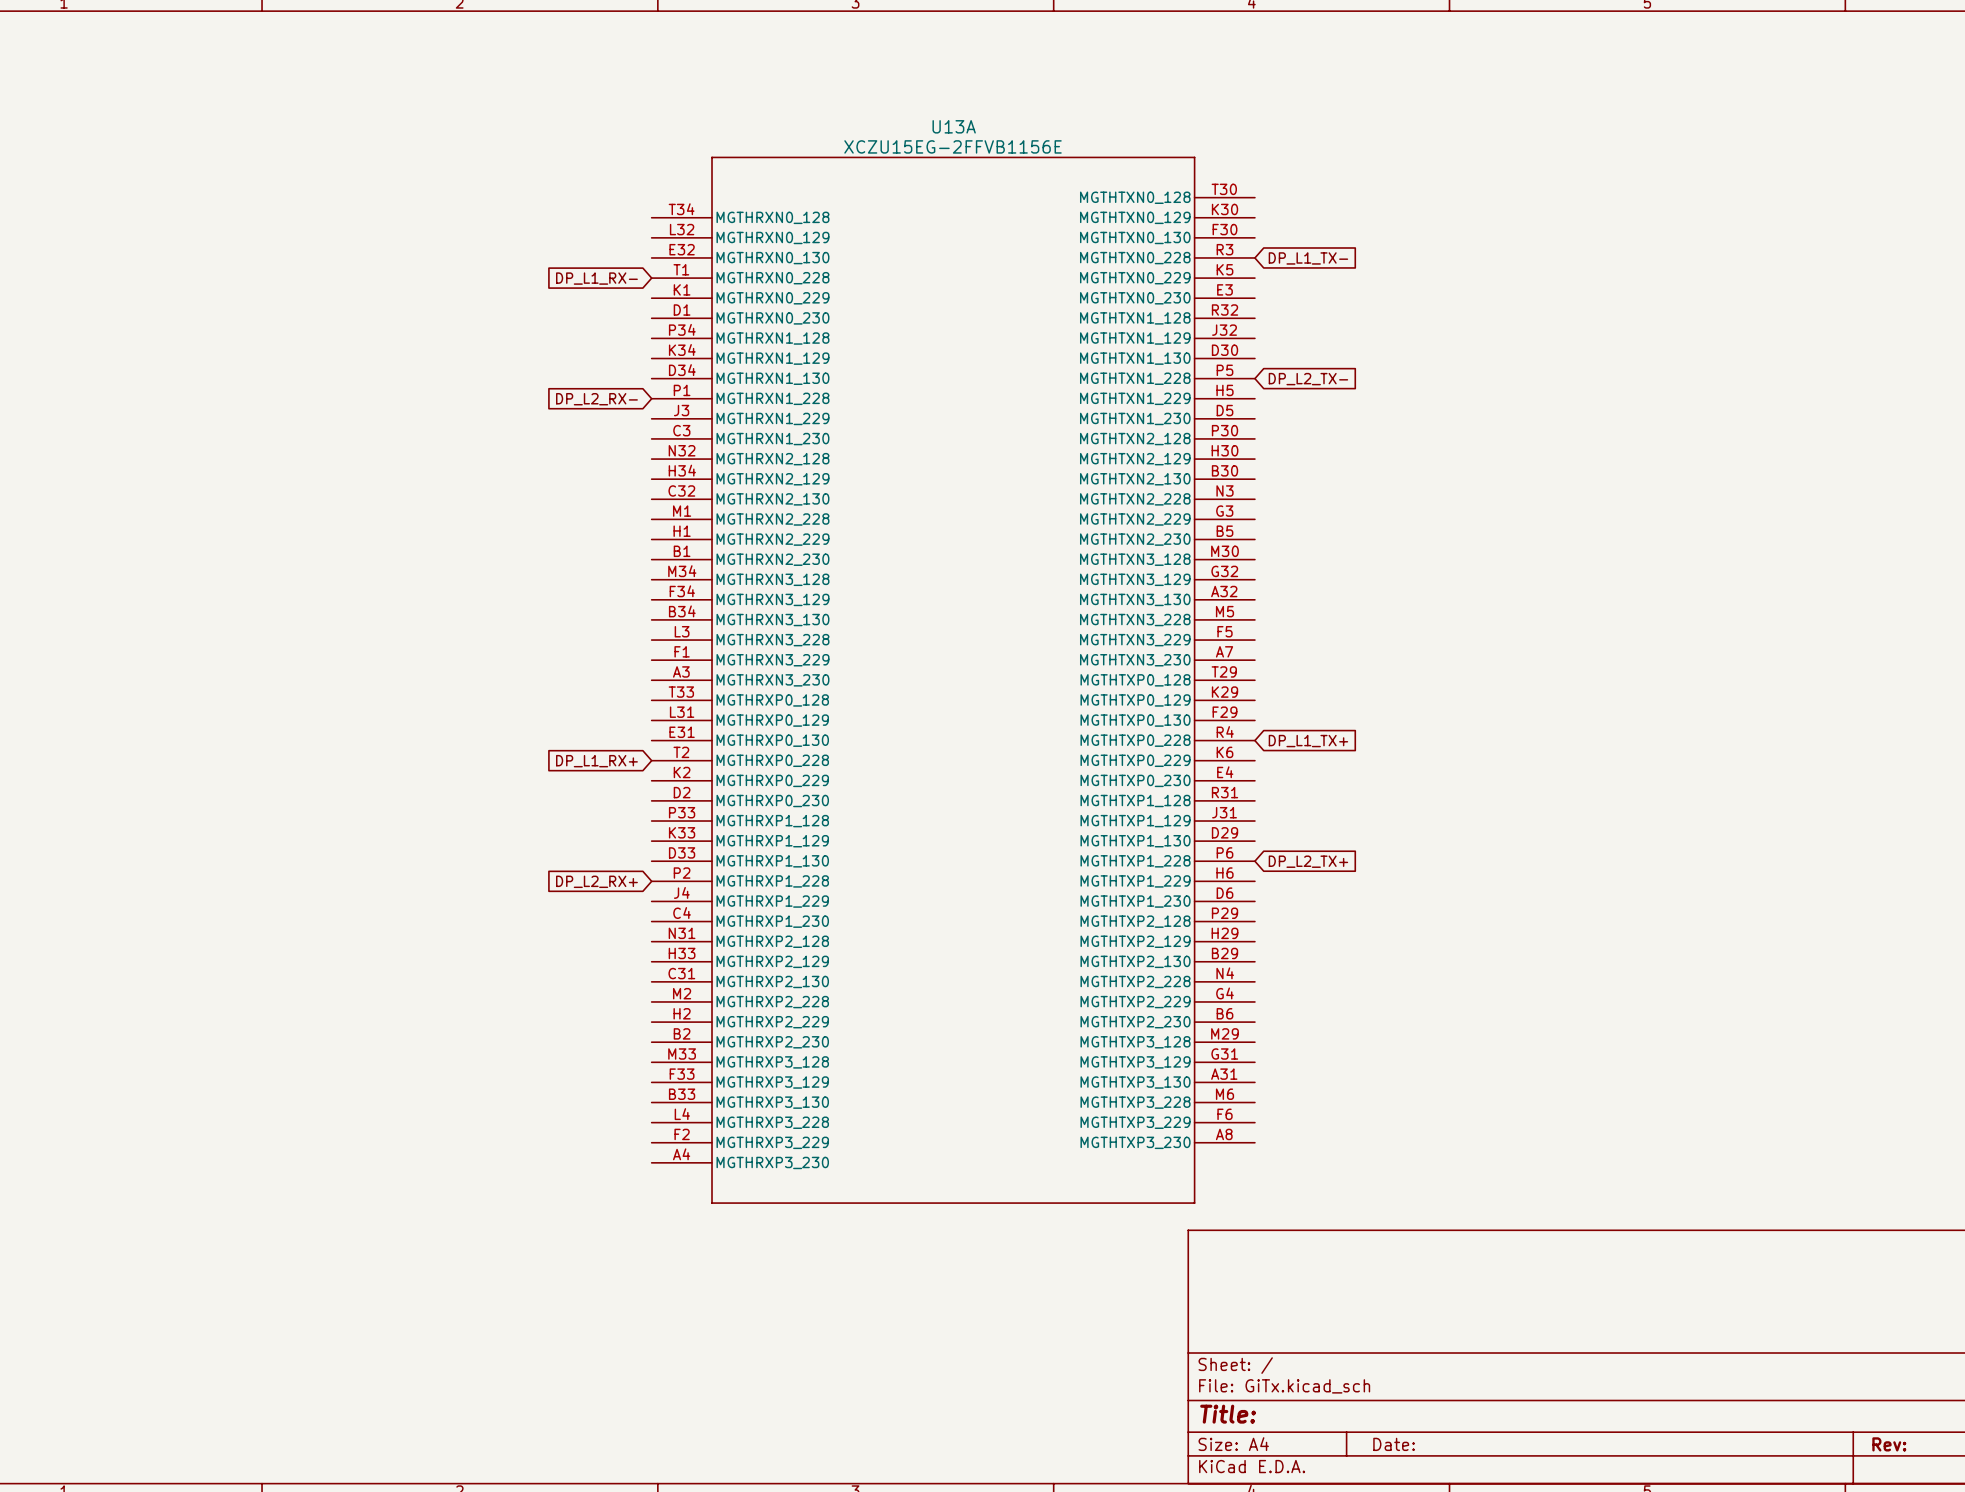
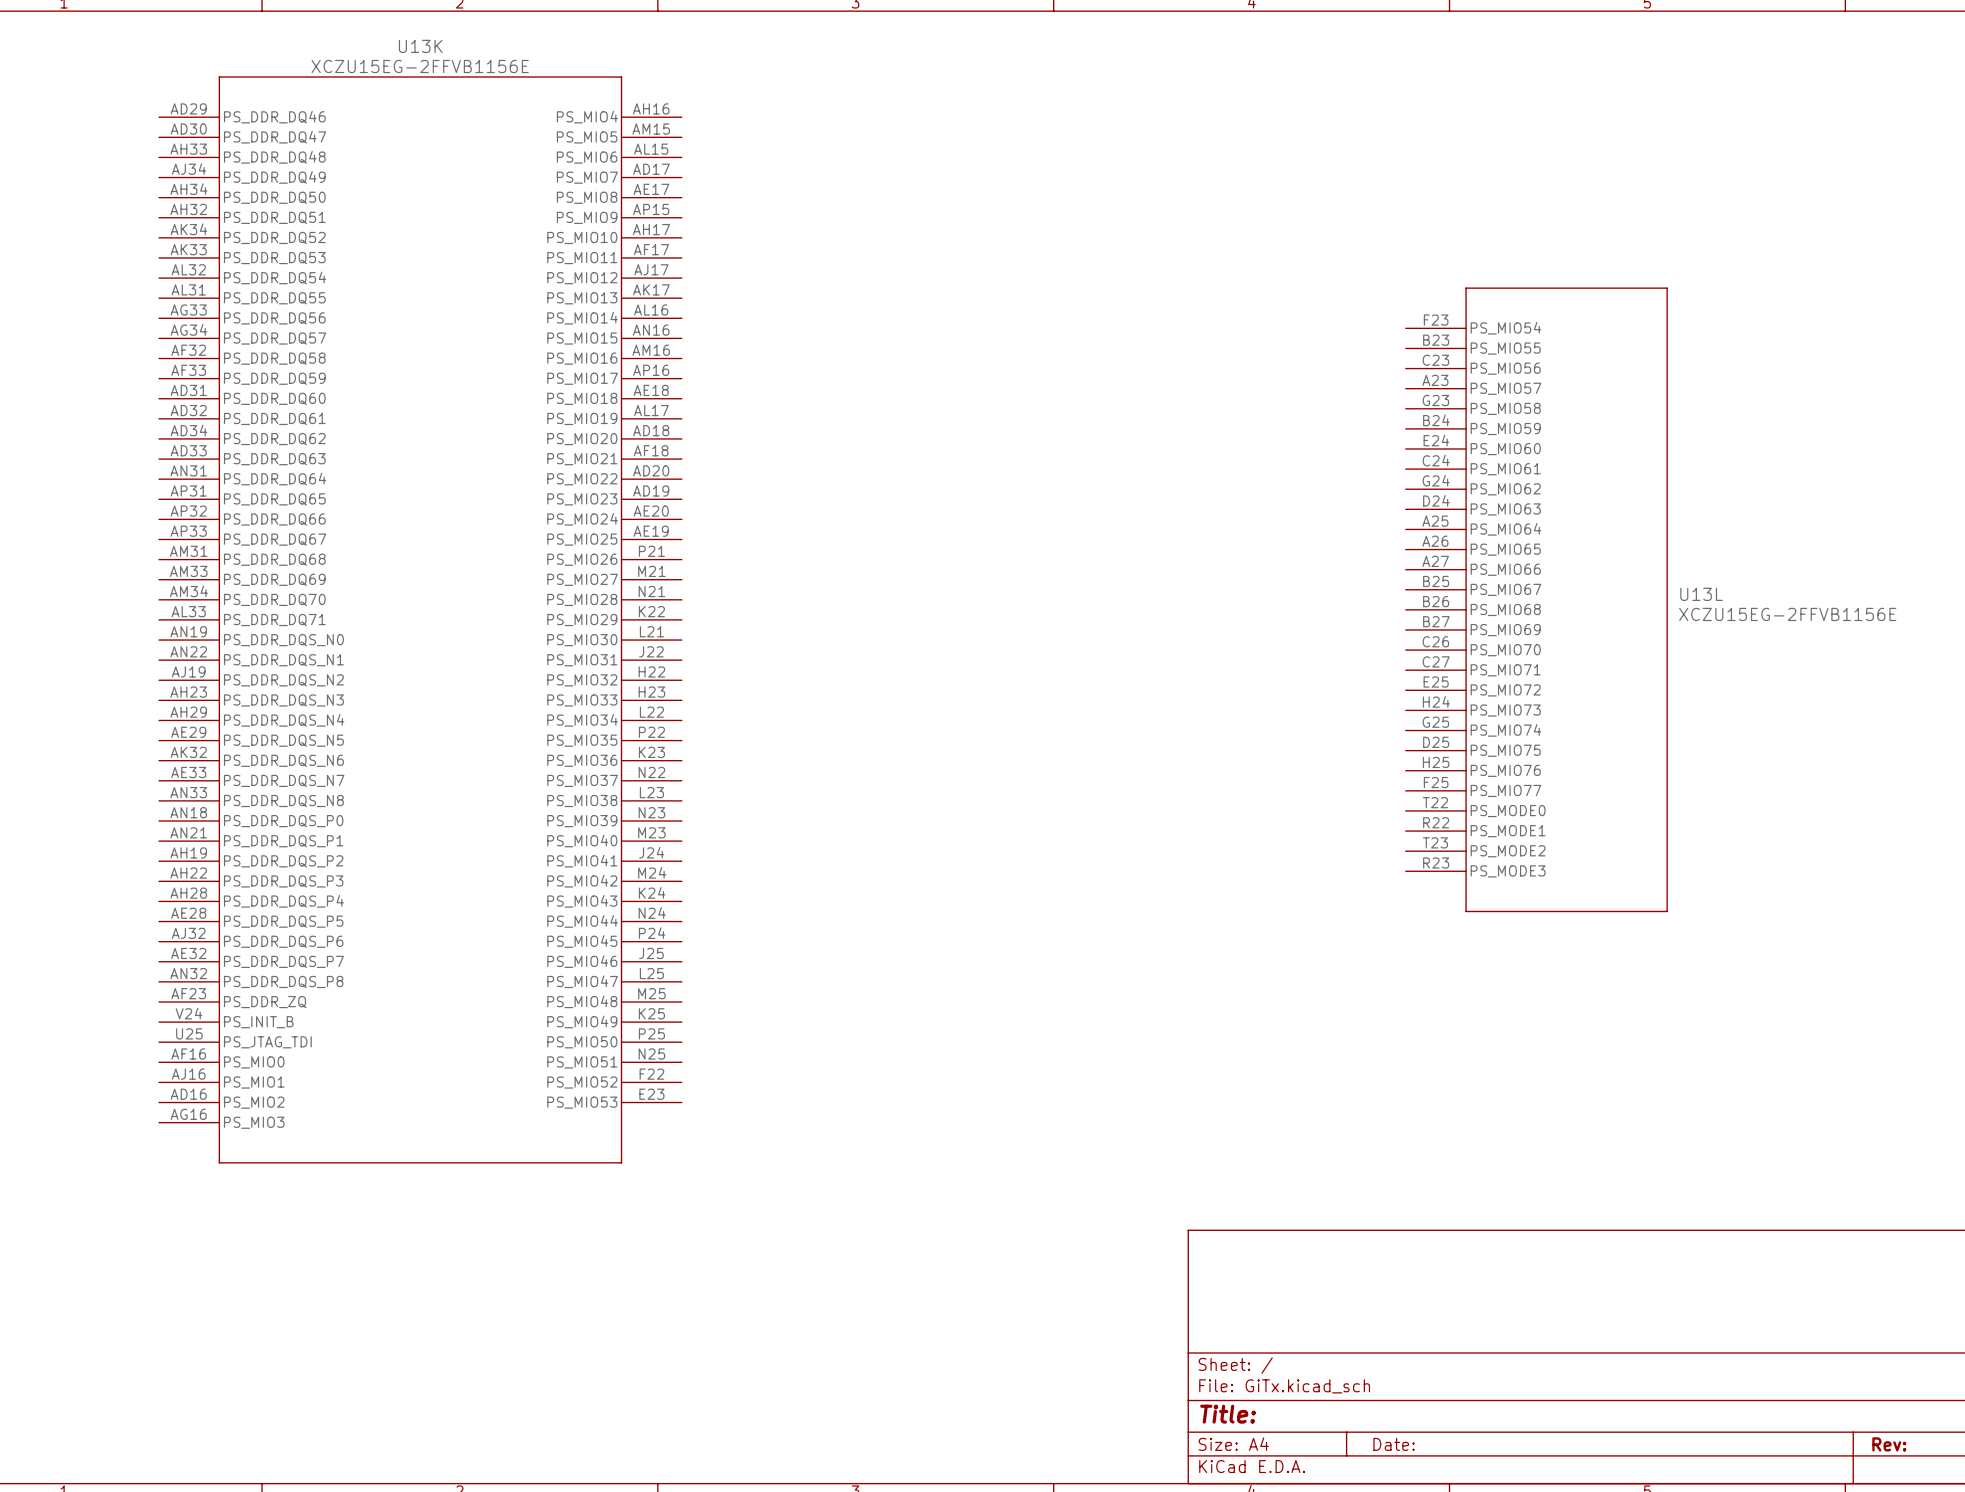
global label: DP_L1_TX- (1308, 258) -> none
global label: DP_L1_RX- (596, 278) -> none
global label: DP_L2_TX- (1308, 379) -> none
global label: DP_L2_RX- (596, 399) -> none
U13L: none -> XCZU15EG-2FFVB1156E (1536, 599)
U13K: none -> XCZU15EG-2FFVB1156E (420, 619)
U13A: XCZU15EG-2FFVB1156E (953, 680) -> none
global label: DP_L1_TX+ (1308, 741) -> none
global label: DP_L1_RX+ (596, 761) -> none
global label: DP_L2_TX+ (1308, 861) -> none
global label: DP_L2_RX+ (596, 881) -> none

